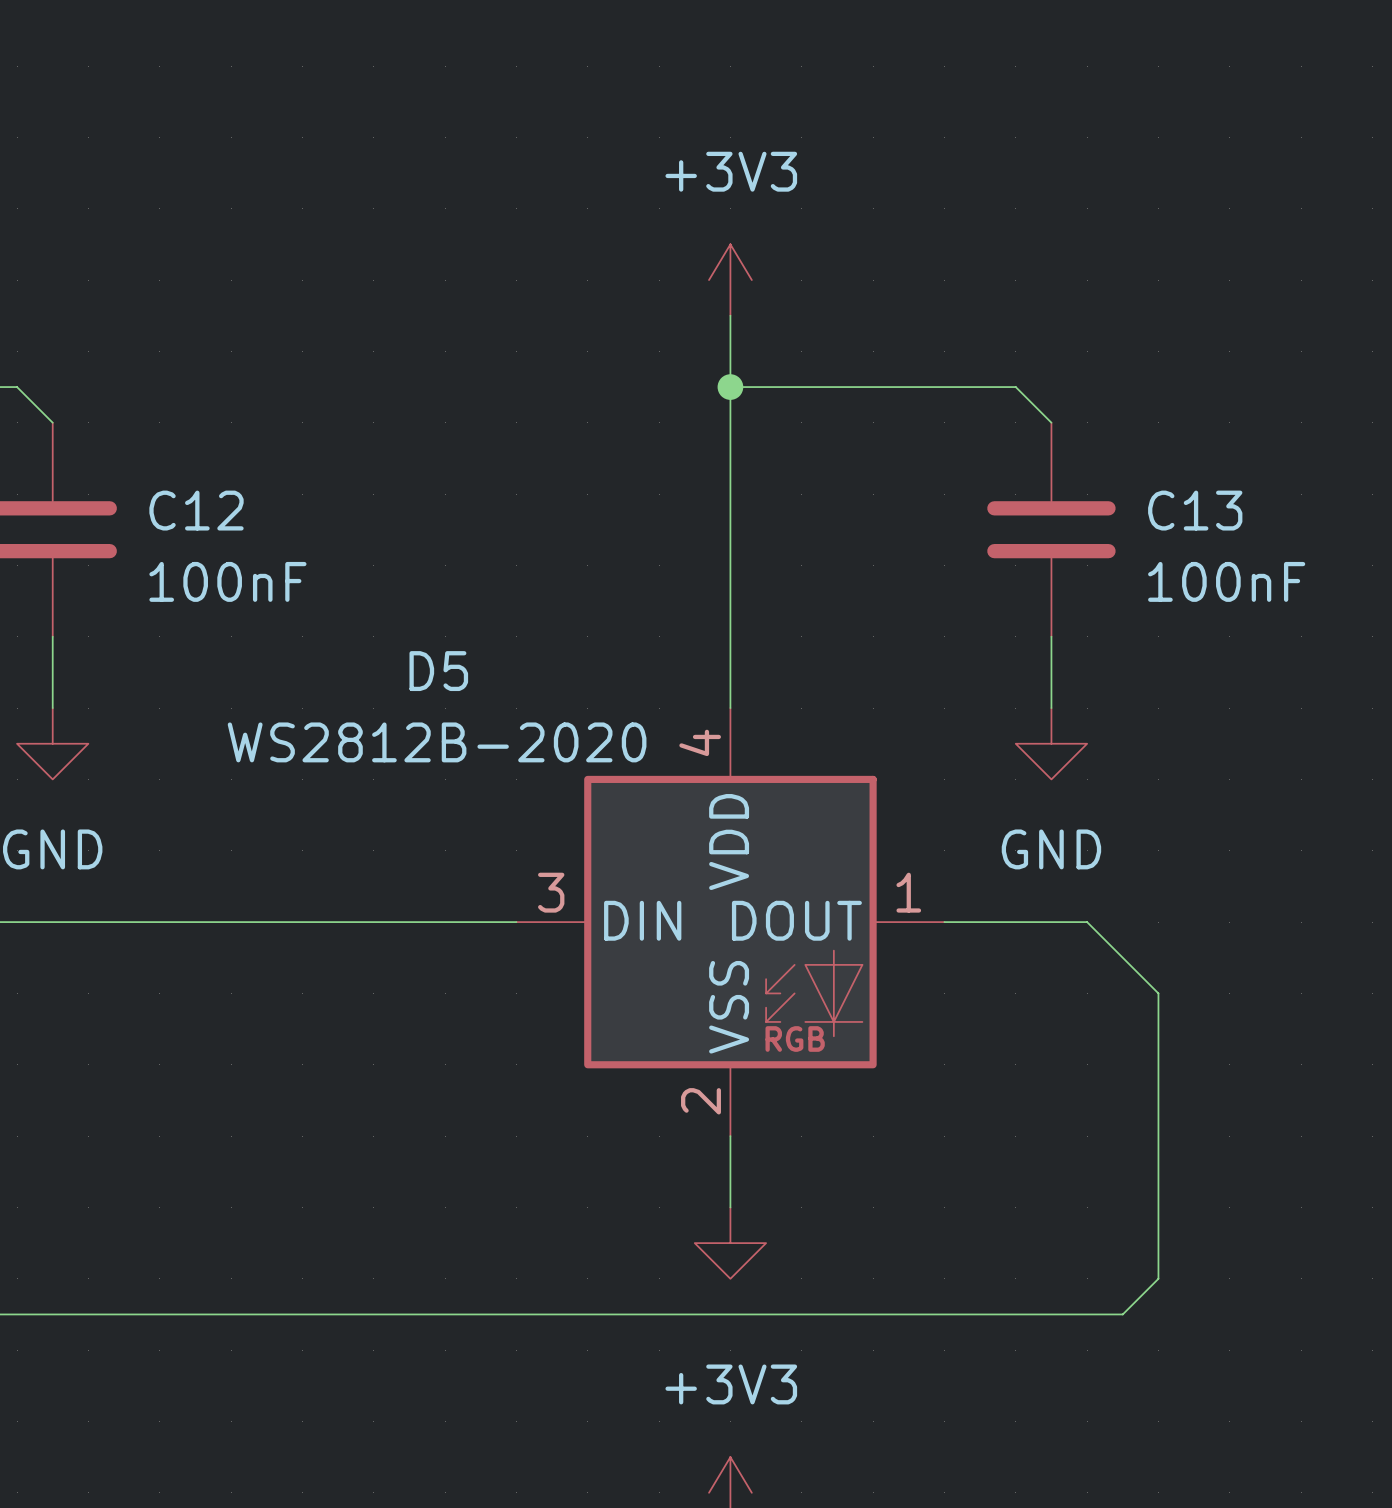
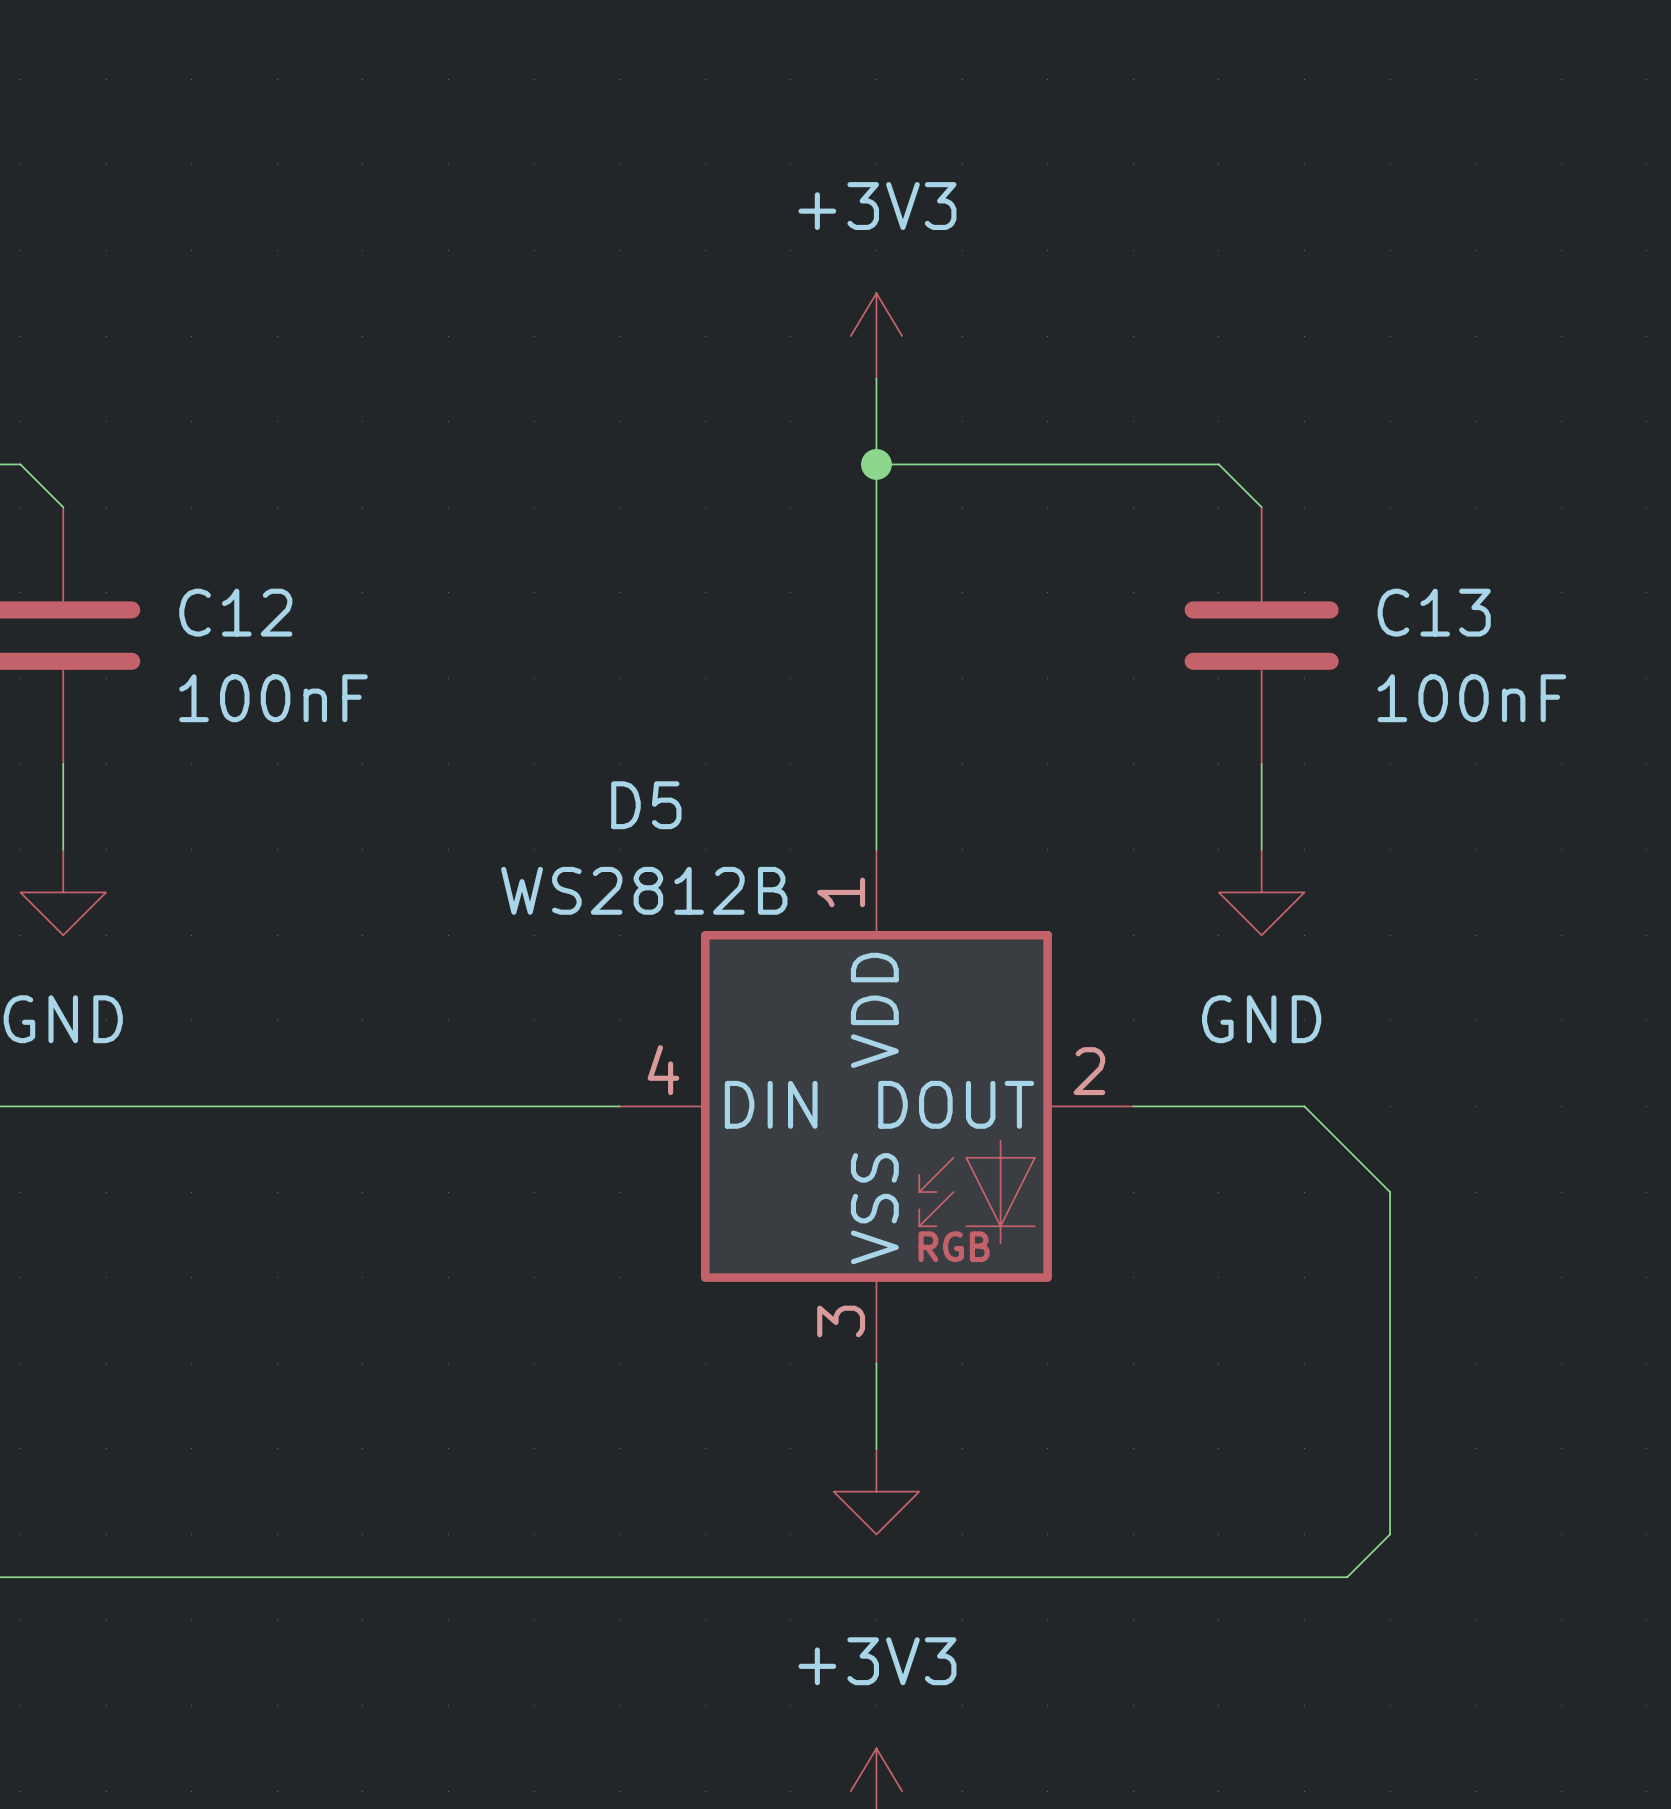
D5 name position: D5 (438, 671) -> D5 (646, 805)
D5 value: WS2812B-2020 (437, 742) -> WS2812B (644, 890)
D5 pin number: 4 (700, 742) -> 1 (841, 892)
D5 pin number: 3 (551, 892) -> 4 (663, 1070)
D5 pin number: 1 (908, 892) -> 2 (1089, 1071)
D5 pin number: 2 (701, 1101) -> 3 (841, 1321)

